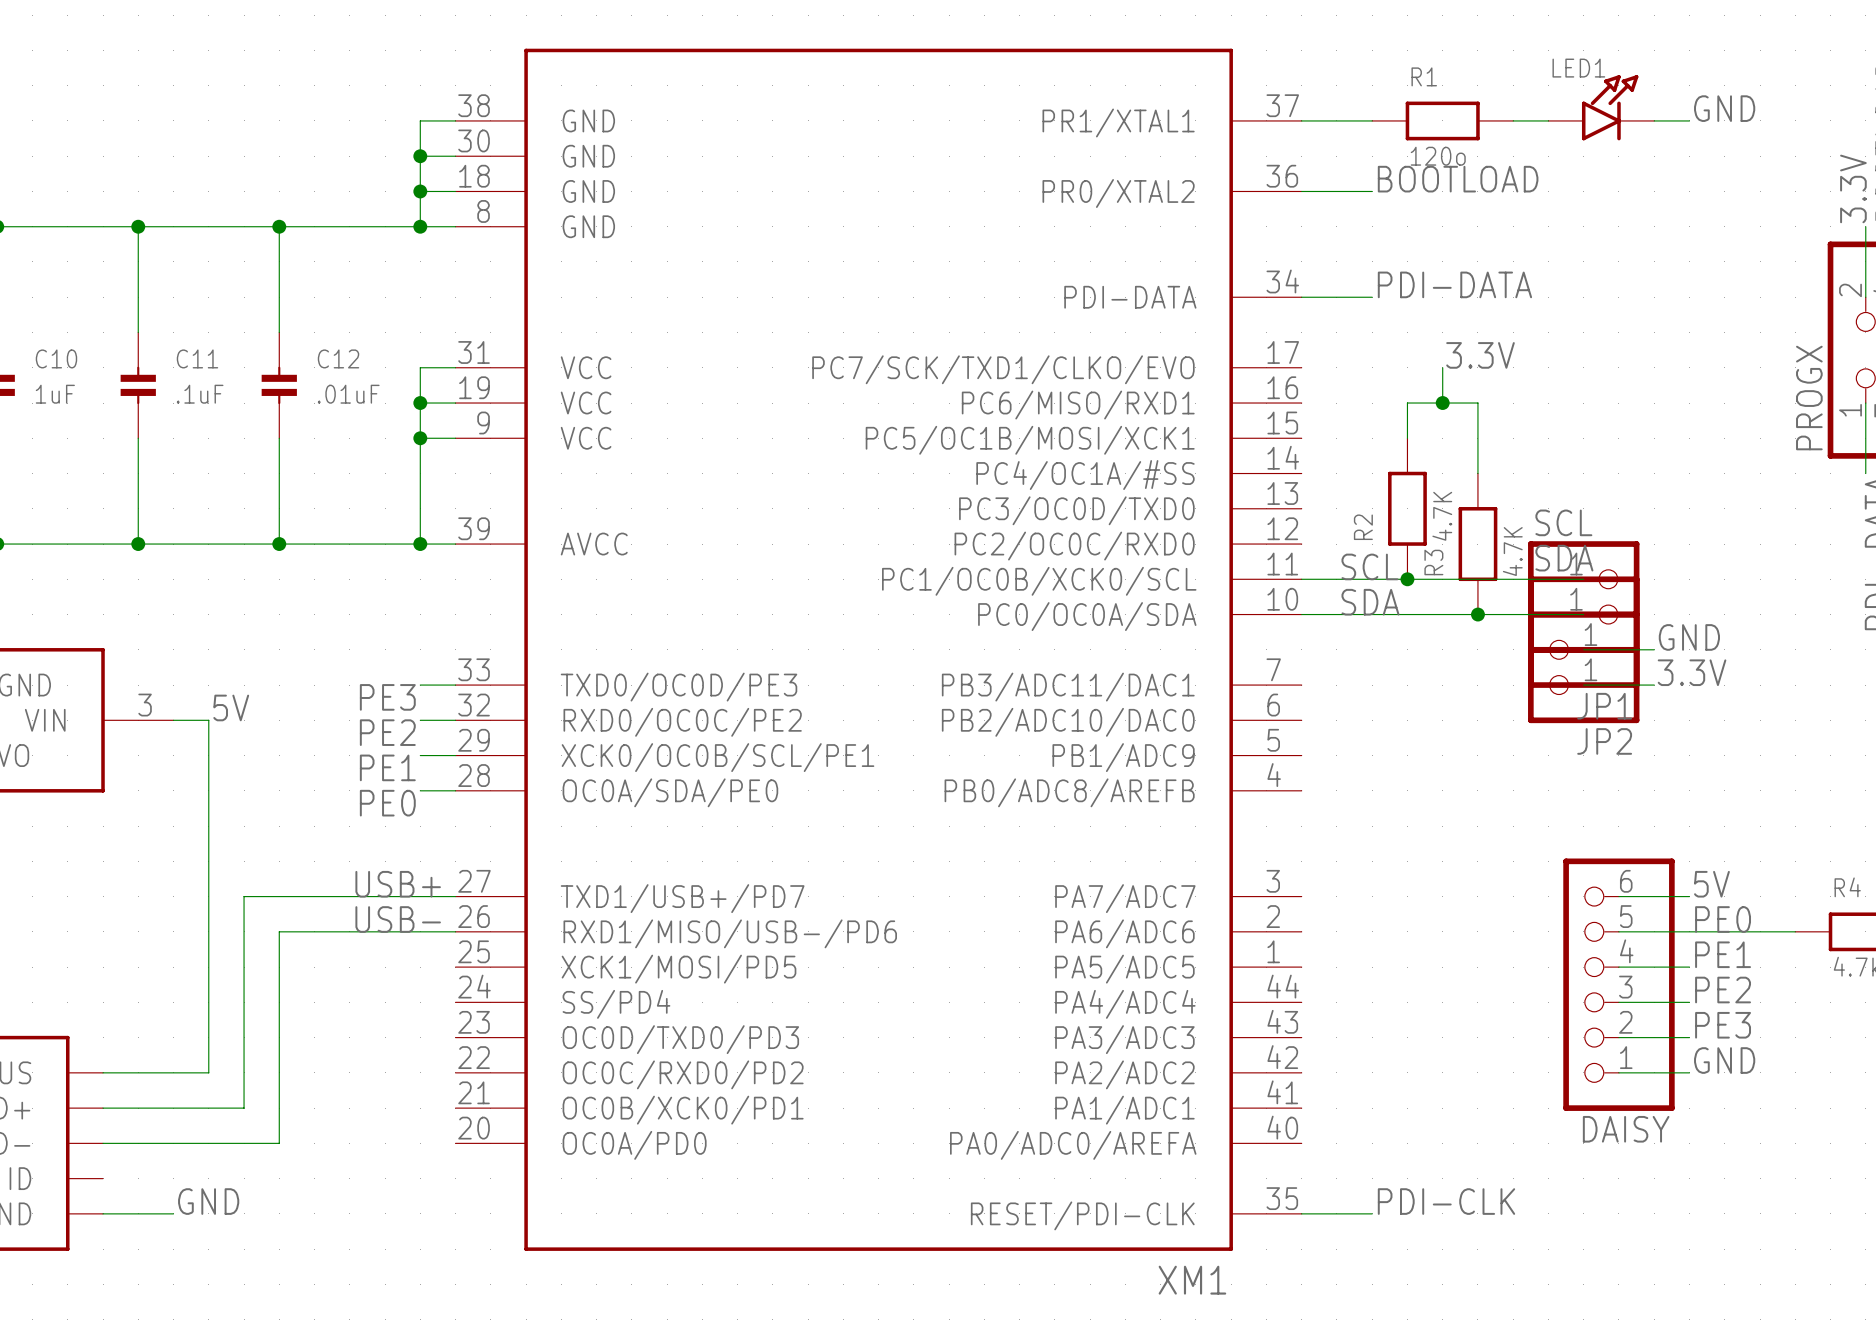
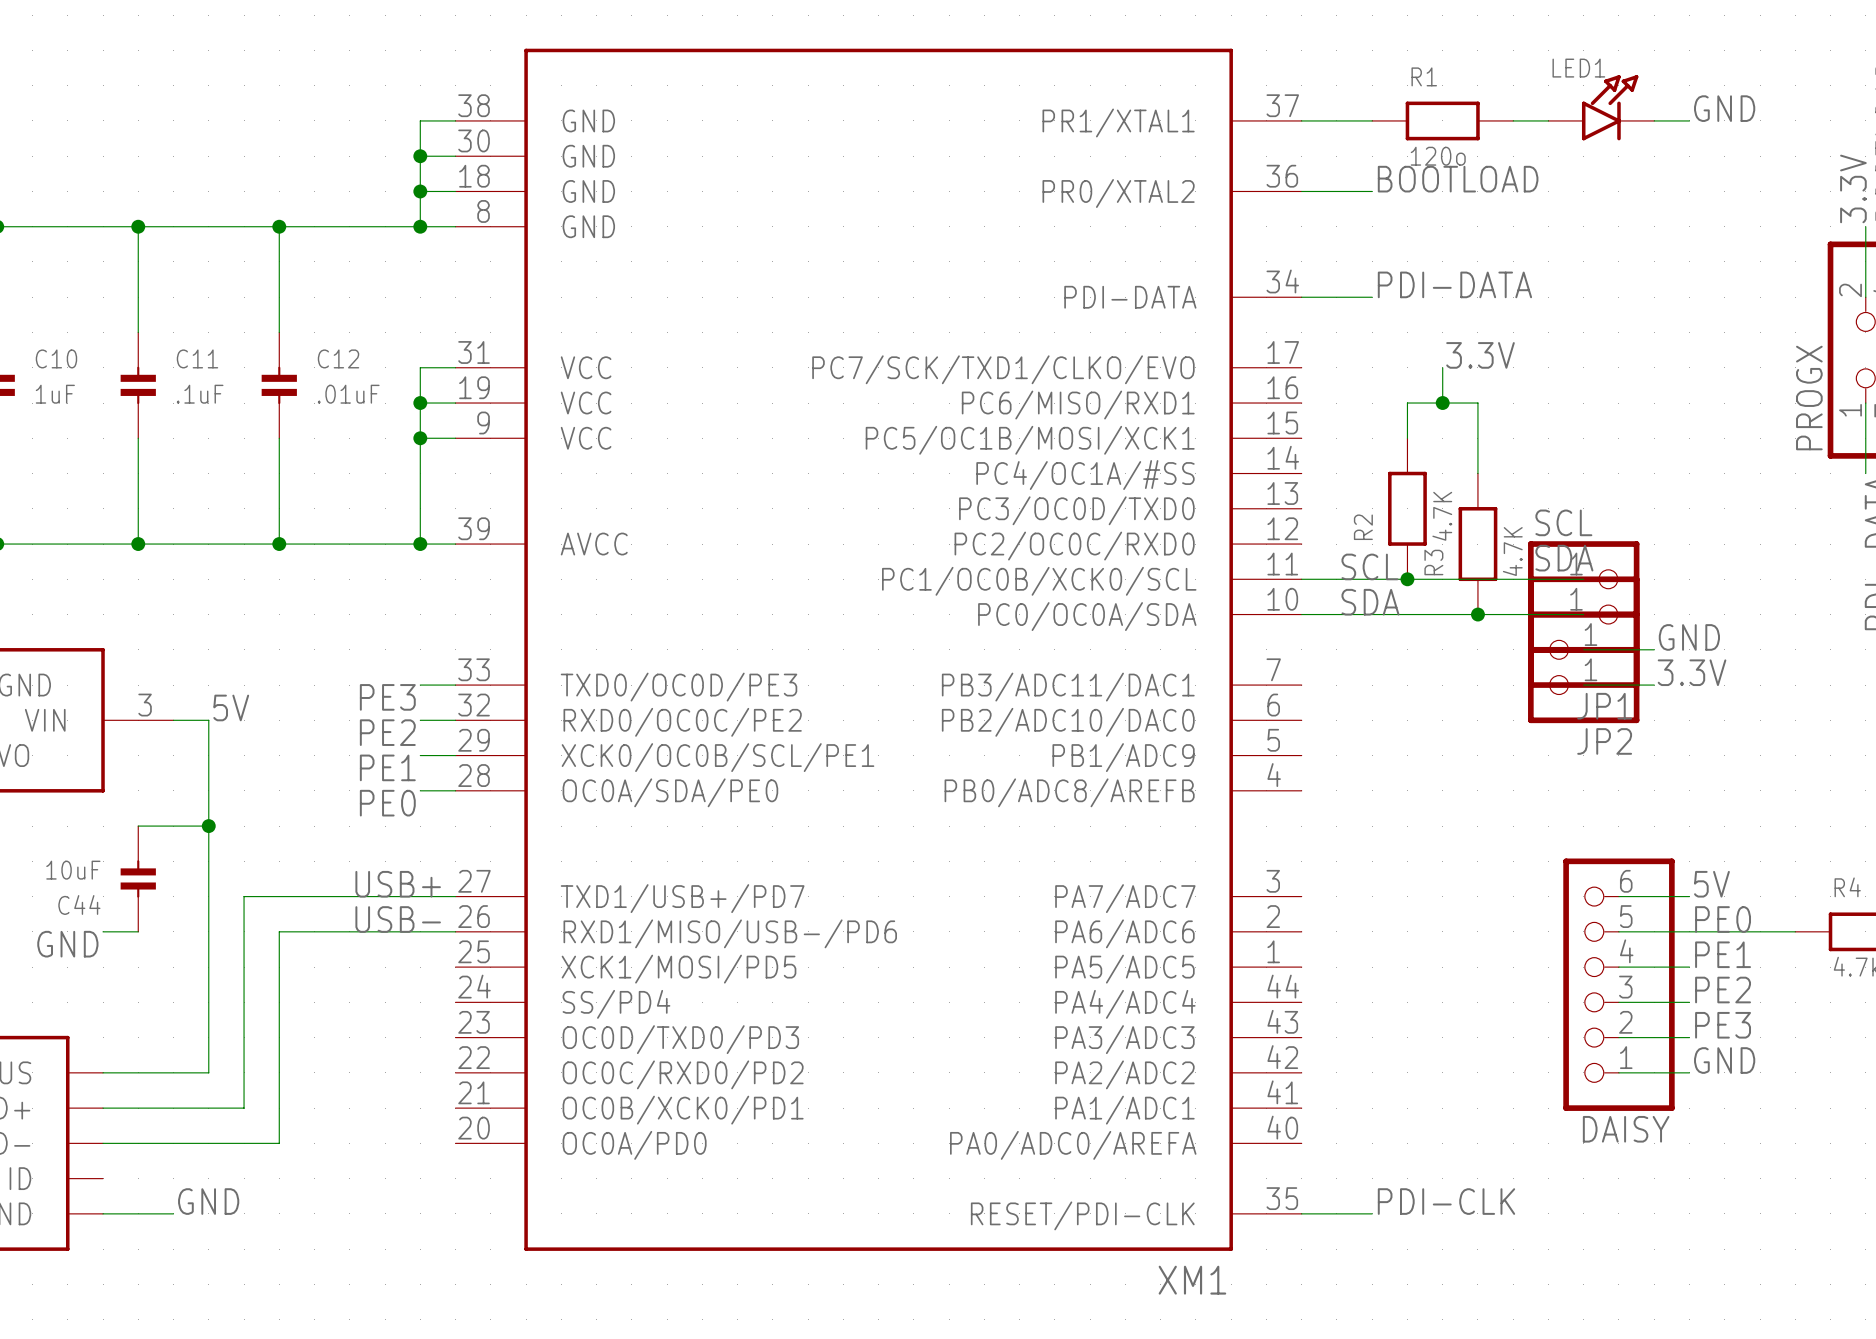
wire: none -> (138, 826) (208, 826)
junction: none -> (208, 826)
C44: none -> 10uF (138, 878)
wire: none -> (103, 931) (138, 931)
label: none -> GND (67, 944)

